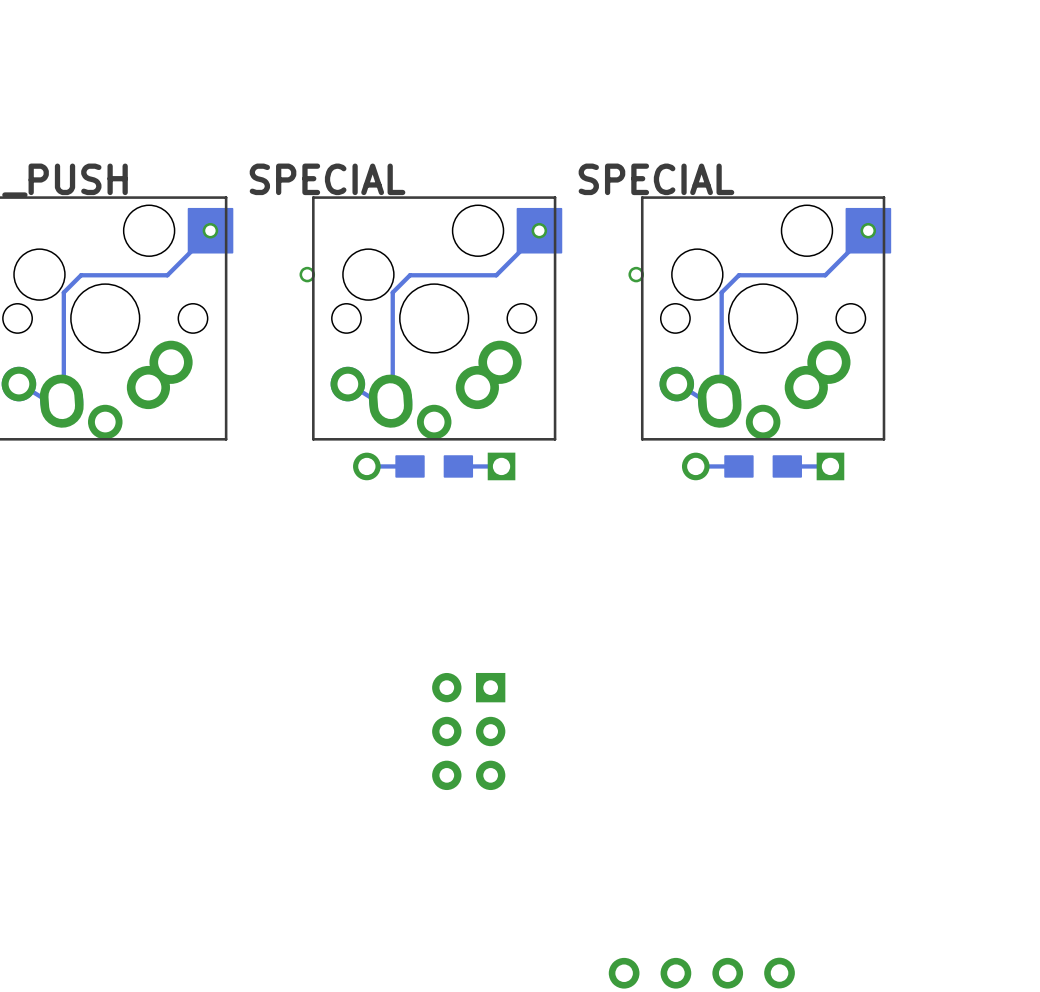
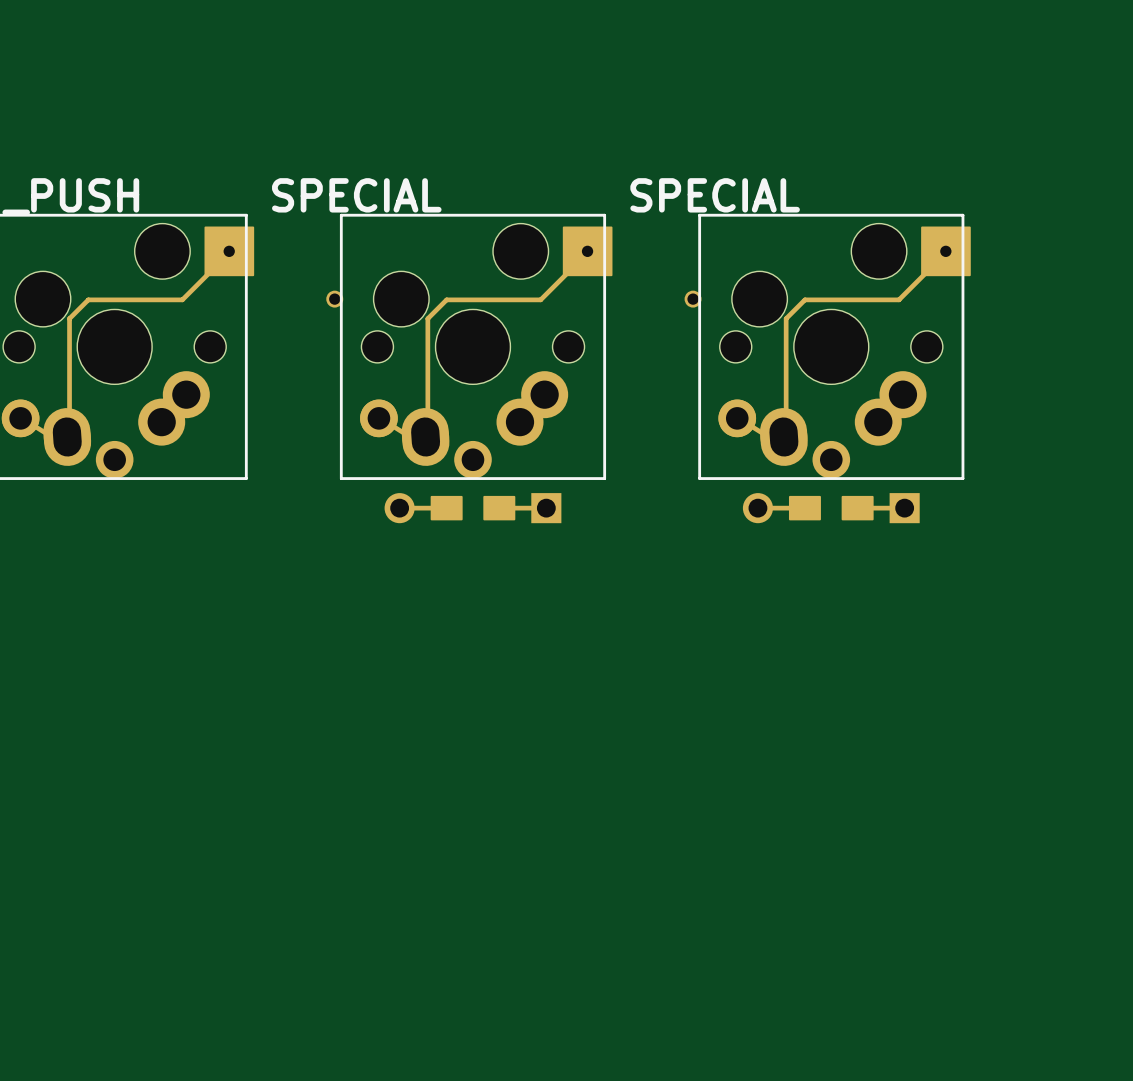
part: (468, 731) -> none
part: (624, 973) -> none
part: (675, 973) -> none
part: (727, 973) -> none
part: (779, 973) -> none

